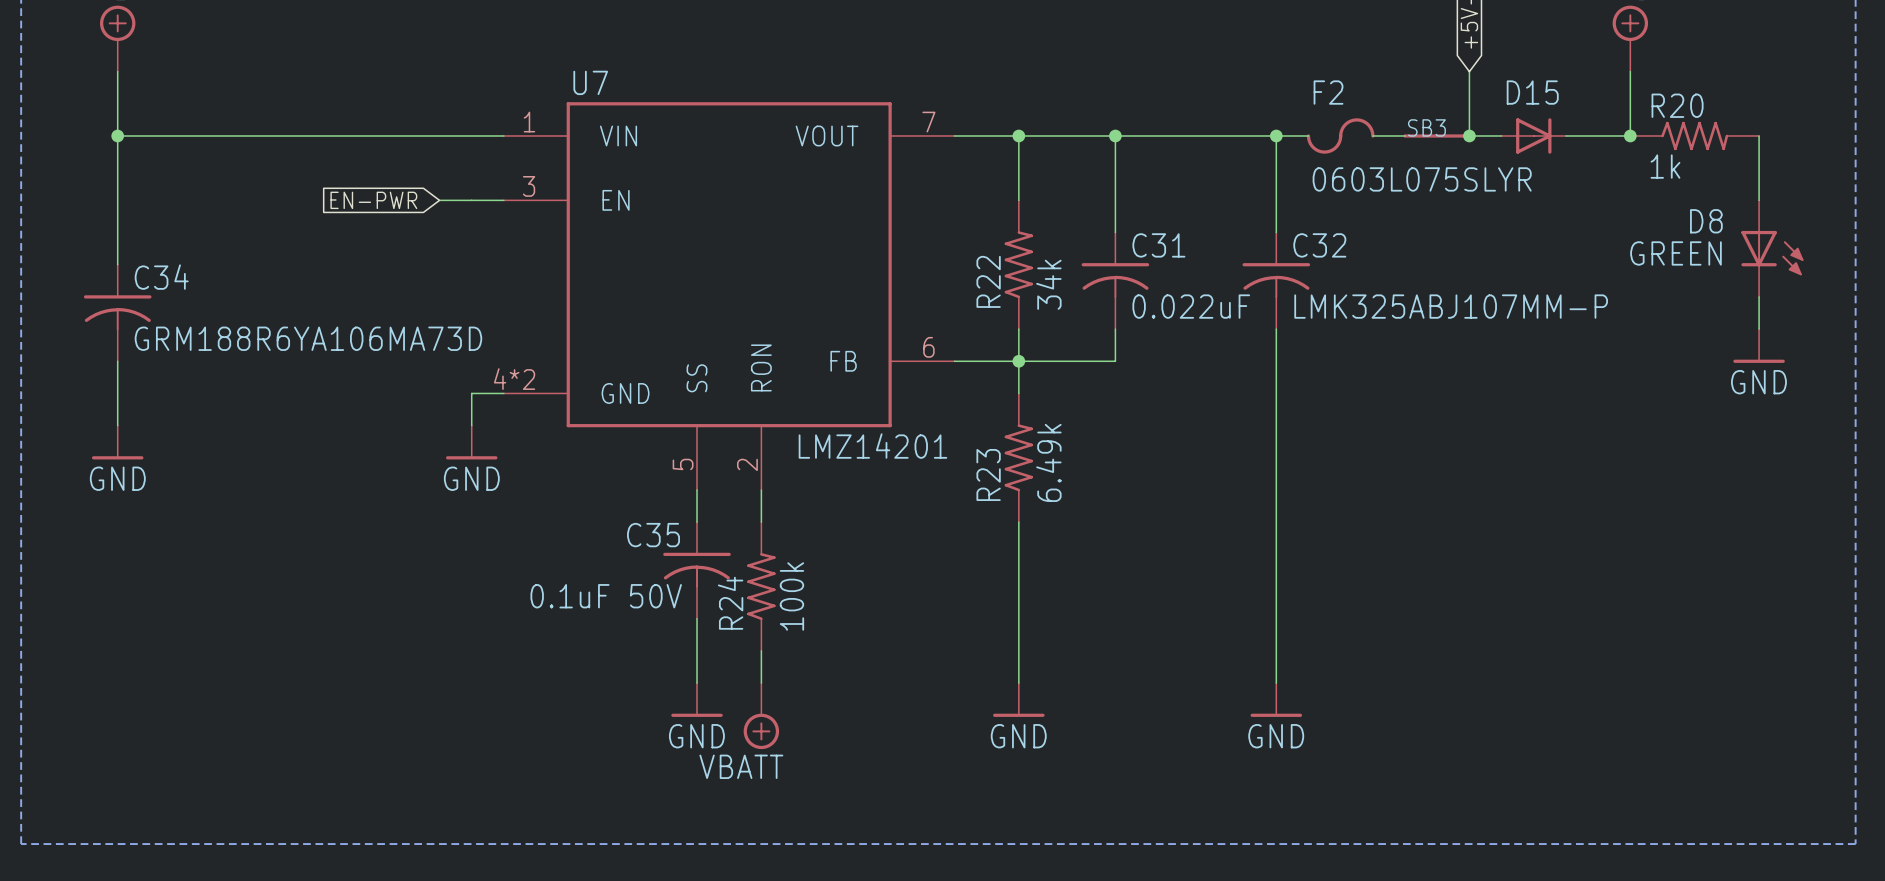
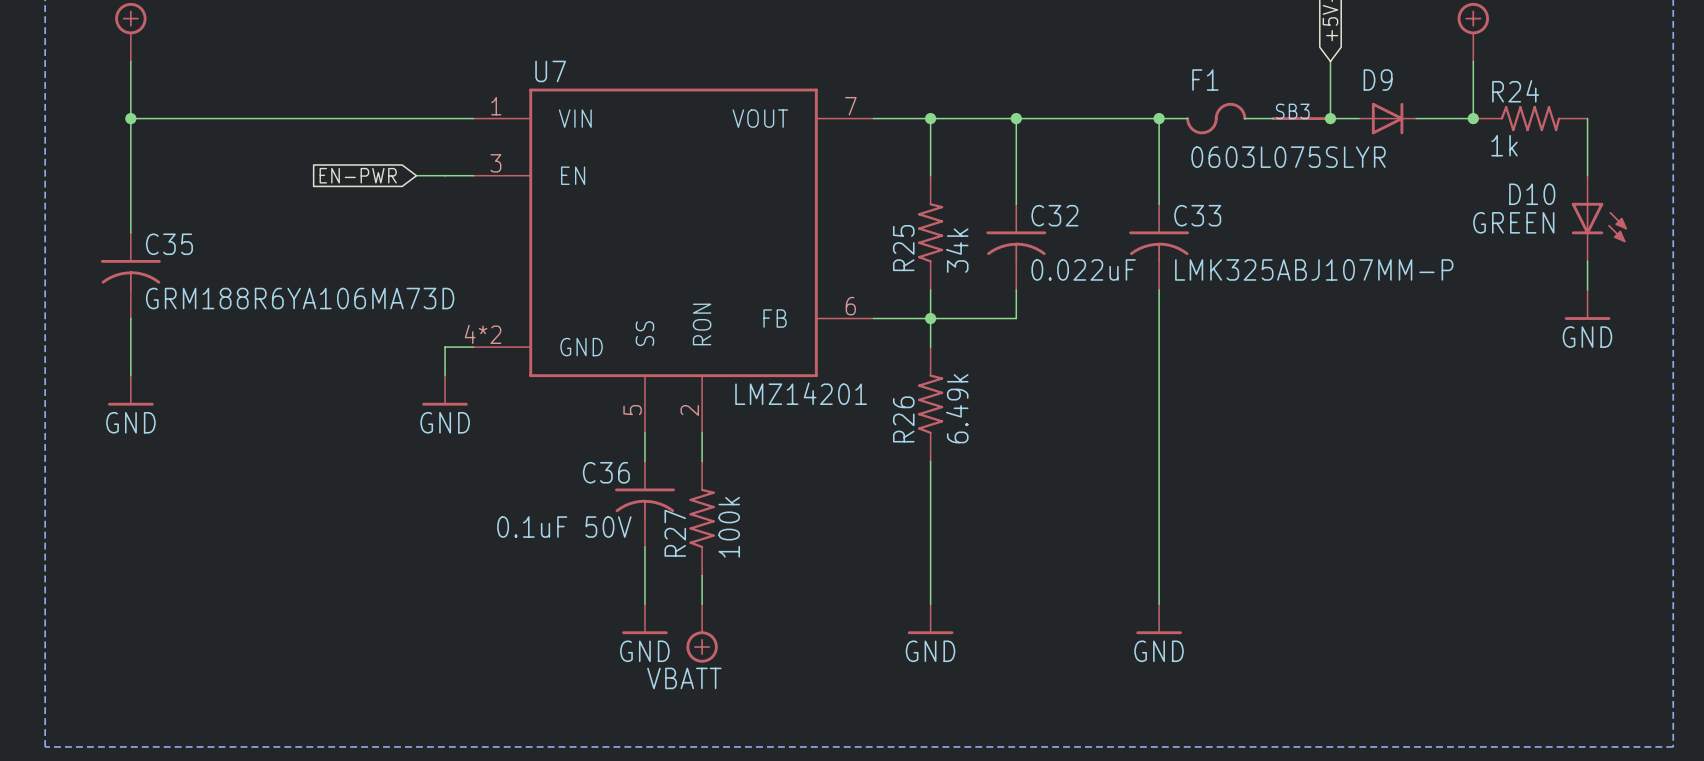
F2 name: F2 (1328, 92) -> F1 (1205, 80)
D15 name: D15 (1532, 92) -> D9 (1378, 80)
R20 name: R20 (1677, 105) -> R24 (1515, 91)
D8 name: D8 (1706, 221) -> D10 (1532, 194)
C31 name: C31 (1158, 245) -> C32 (1054, 215)
C32 name: C32 (1319, 245) -> C33 (1197, 215)
C34 name: C34 (161, 277) -> C35 (169, 244)
R22 name: R22 (988, 281) -> R25 (903, 248)
R23 name: R23 (988, 474) -> R26 (903, 419)
C35 name: C35 (653, 535) -> C36 (606, 472)
R24 name: R24 (730, 603) -> R27 (675, 533)

